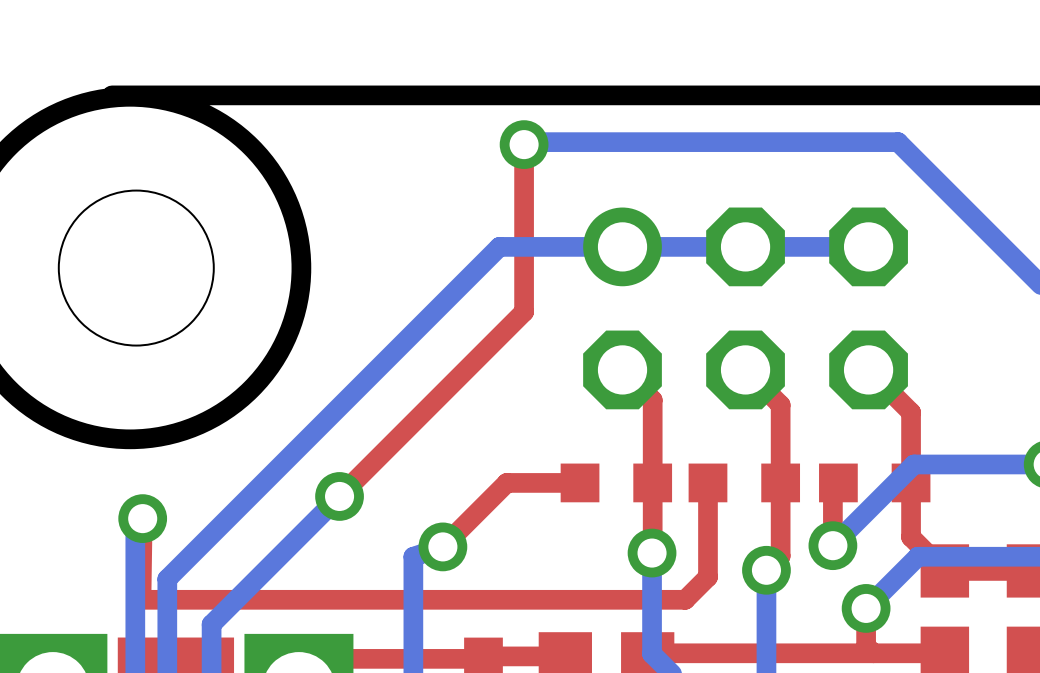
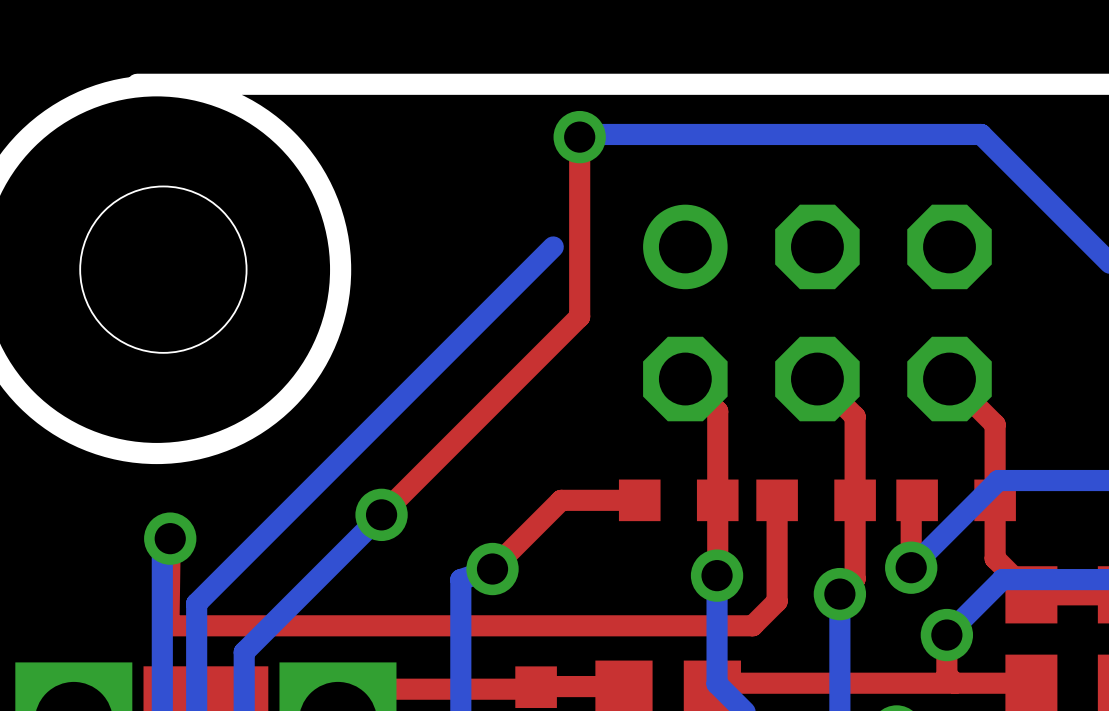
bottom track: (868, 246) (499, 246) -> none

